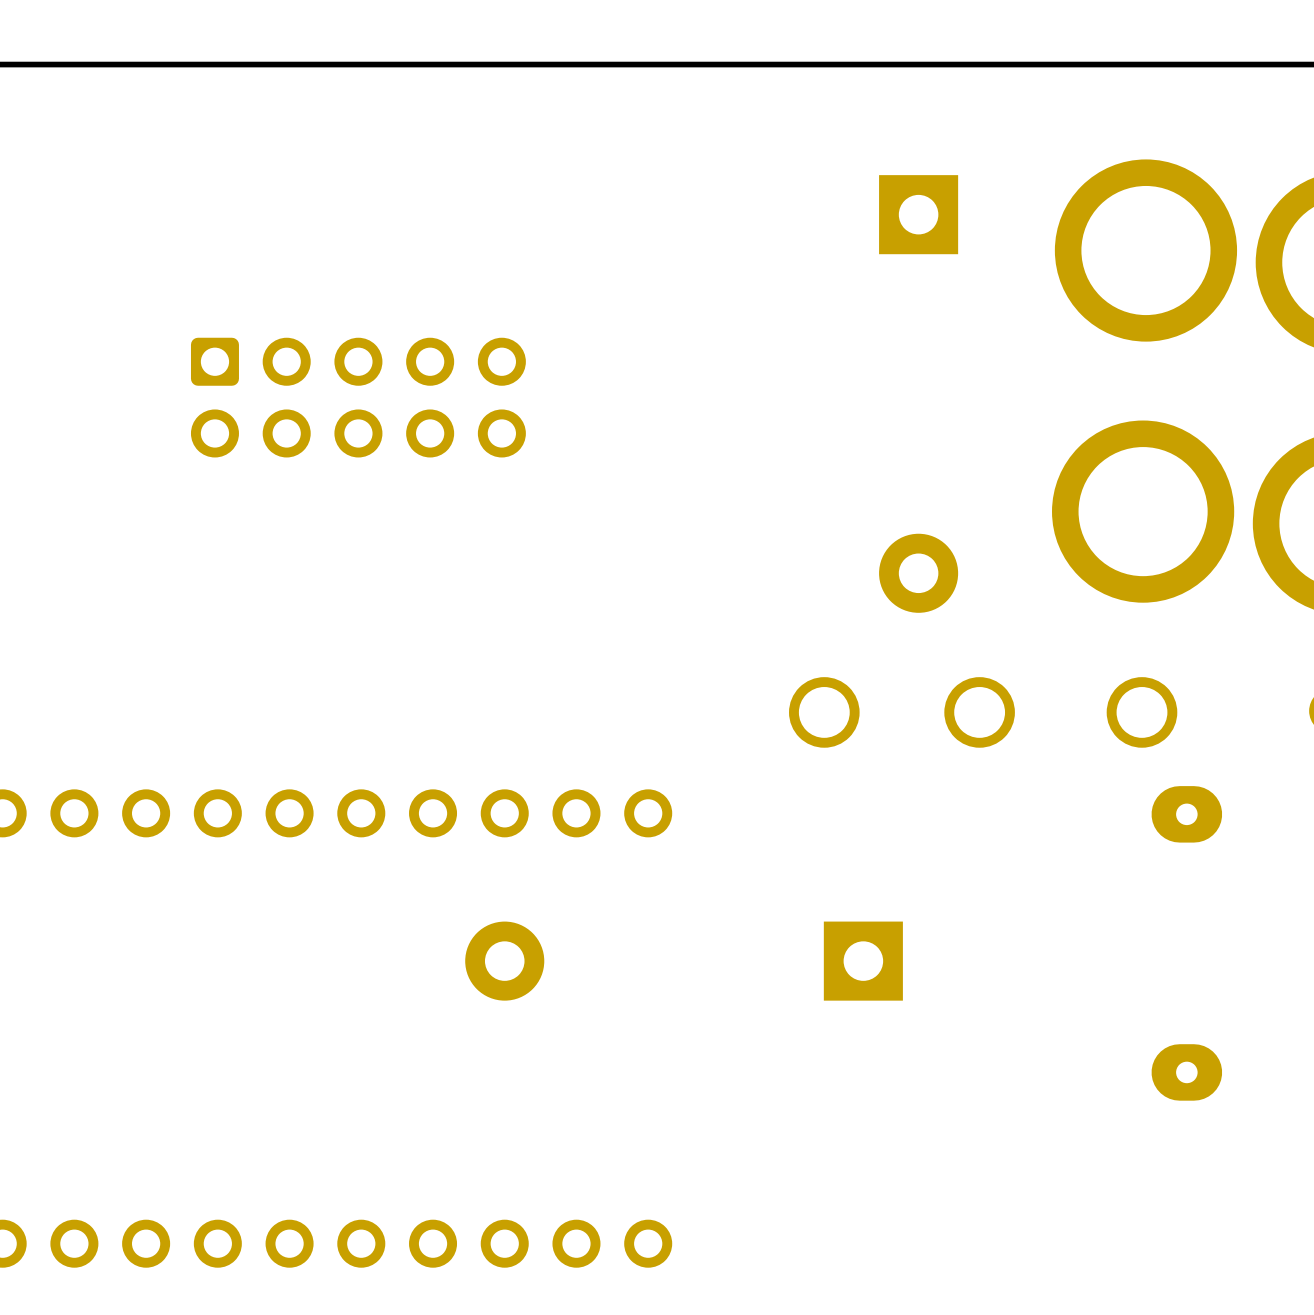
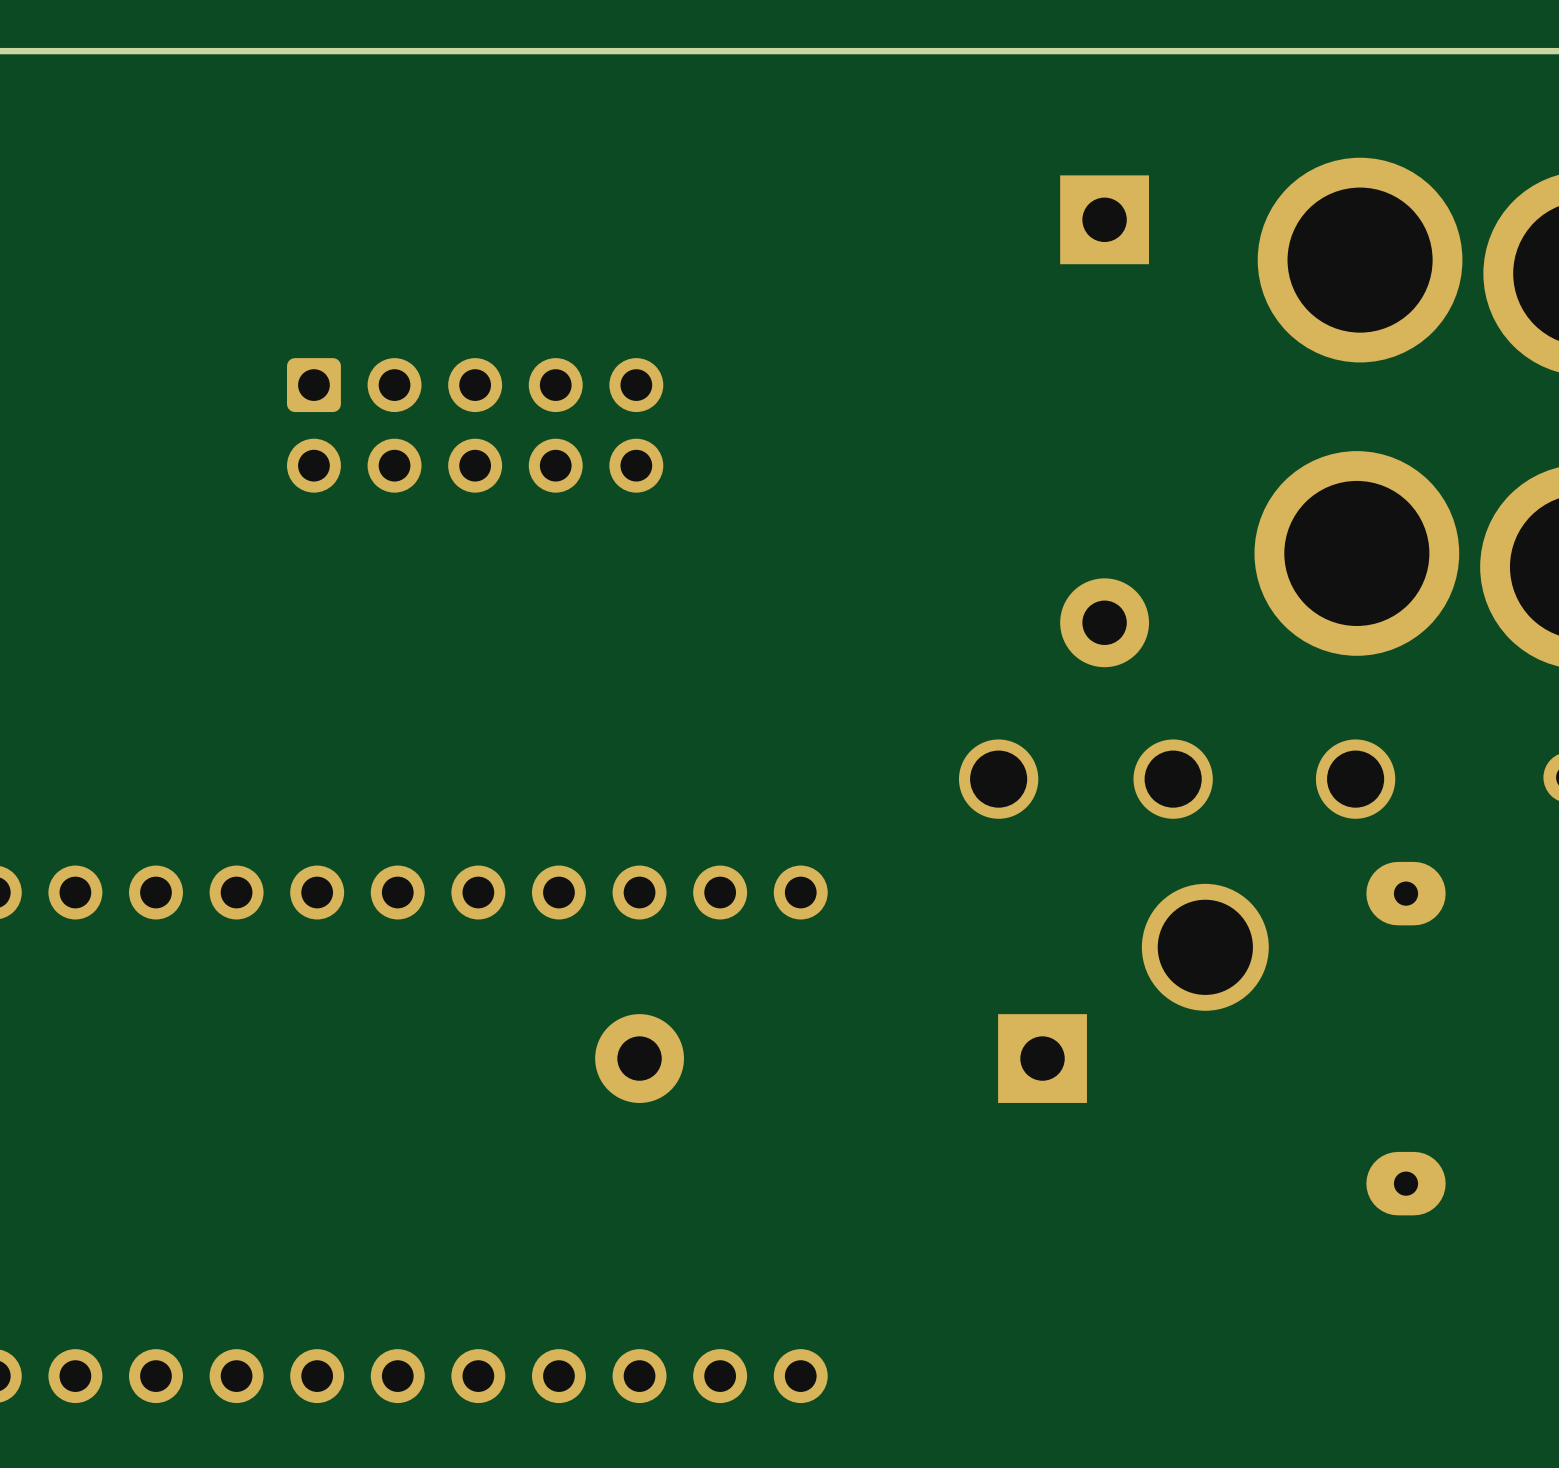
part: none -> (1205, 947)

